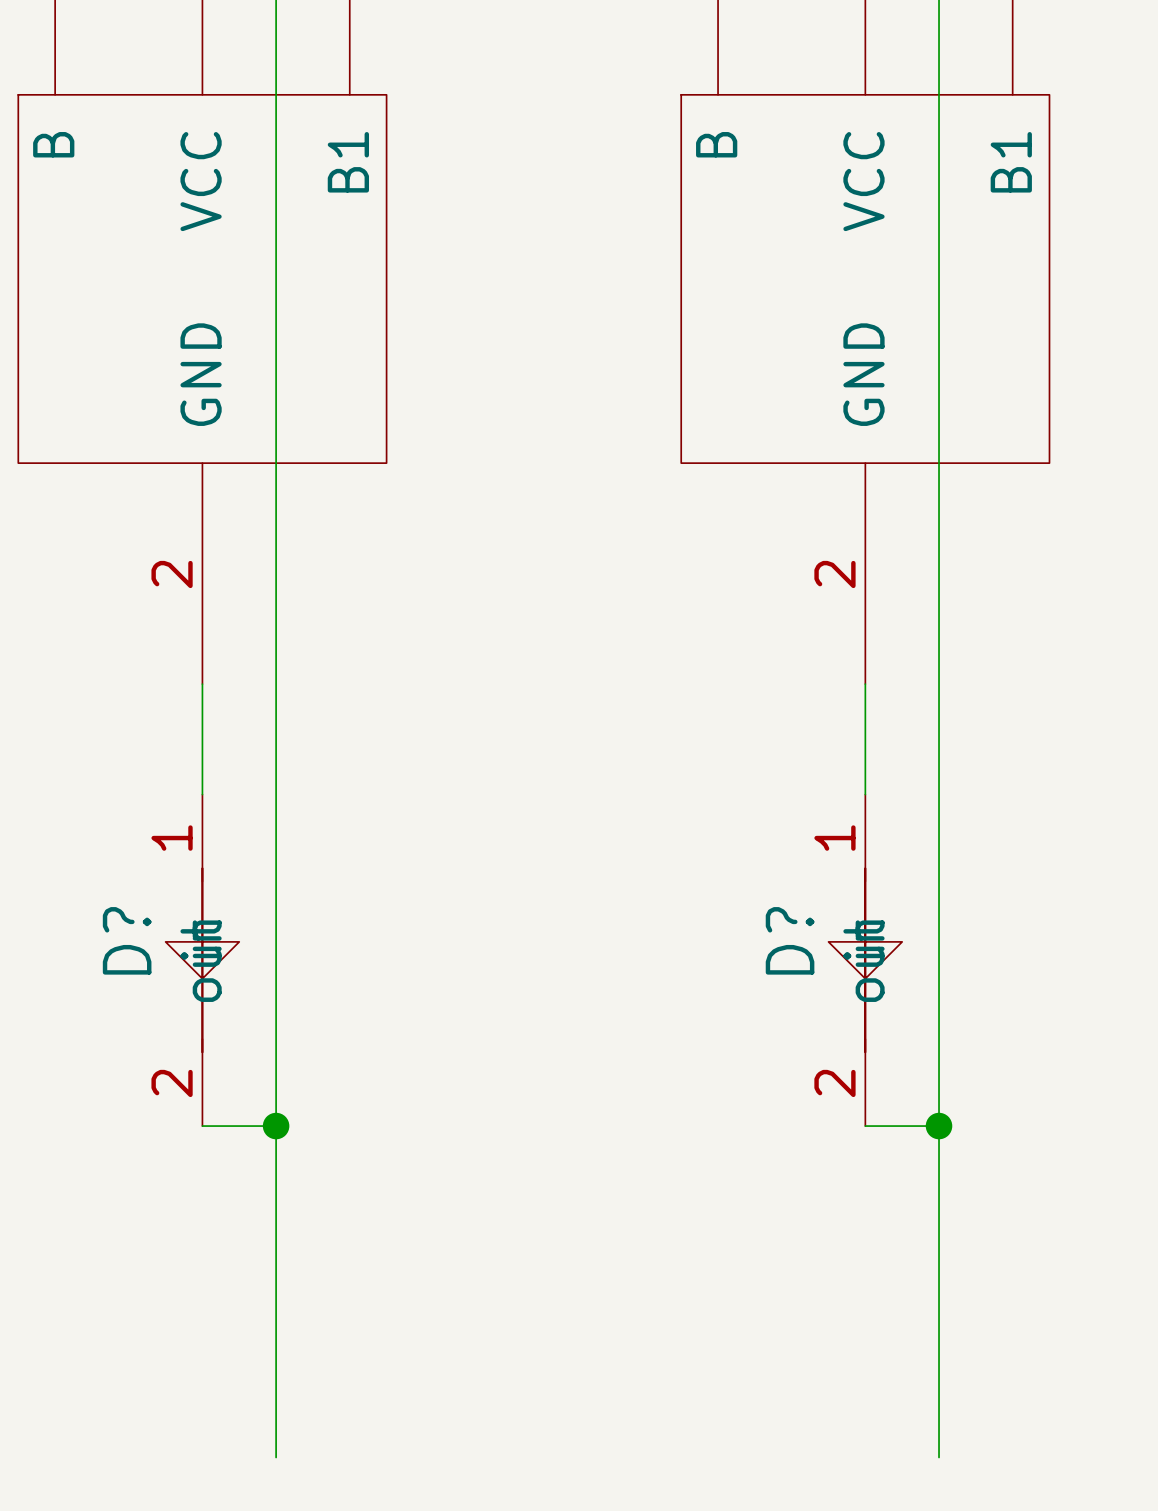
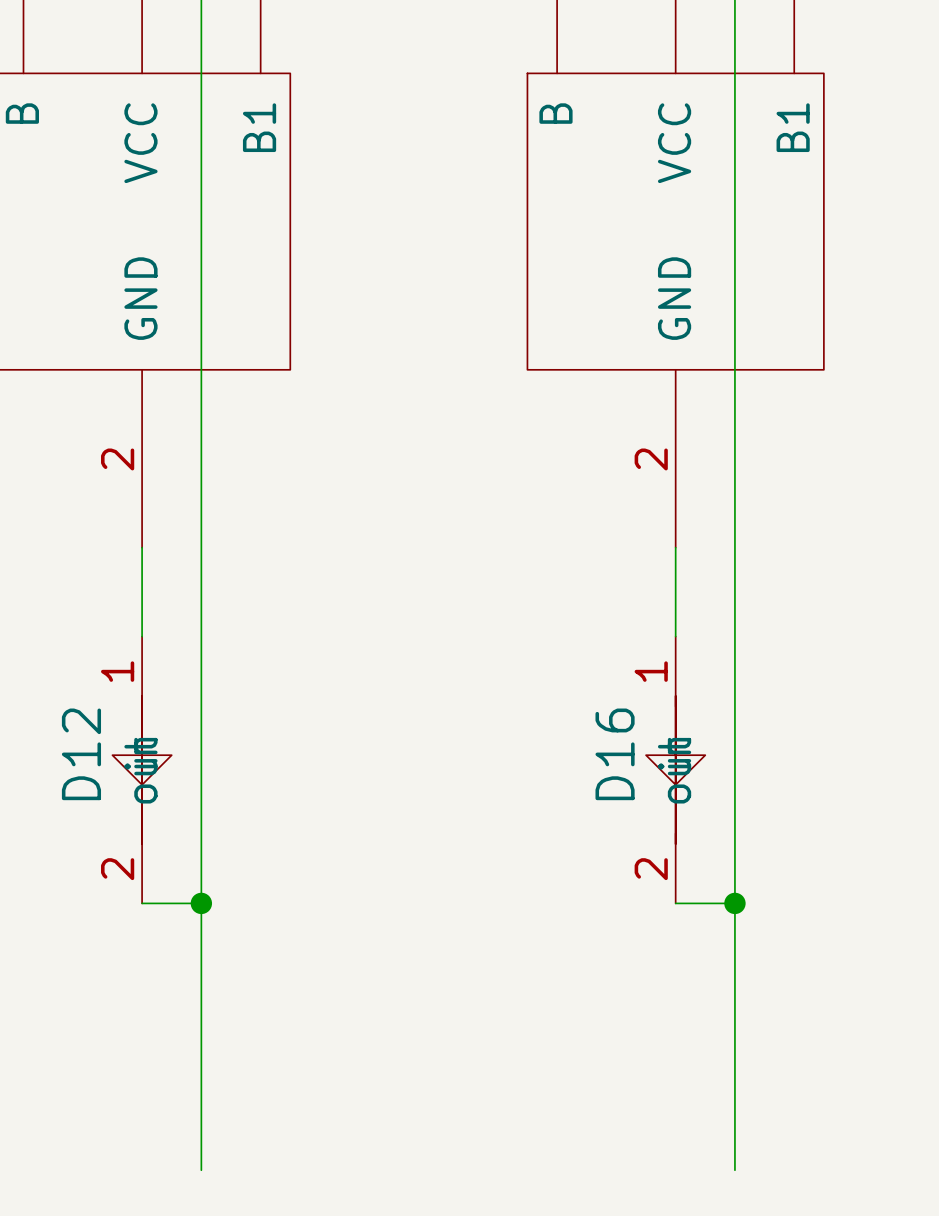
D? name: D? (127, 940) -> D12 (81, 754)
D? name: D? (790, 940) -> D16 (615, 754)

